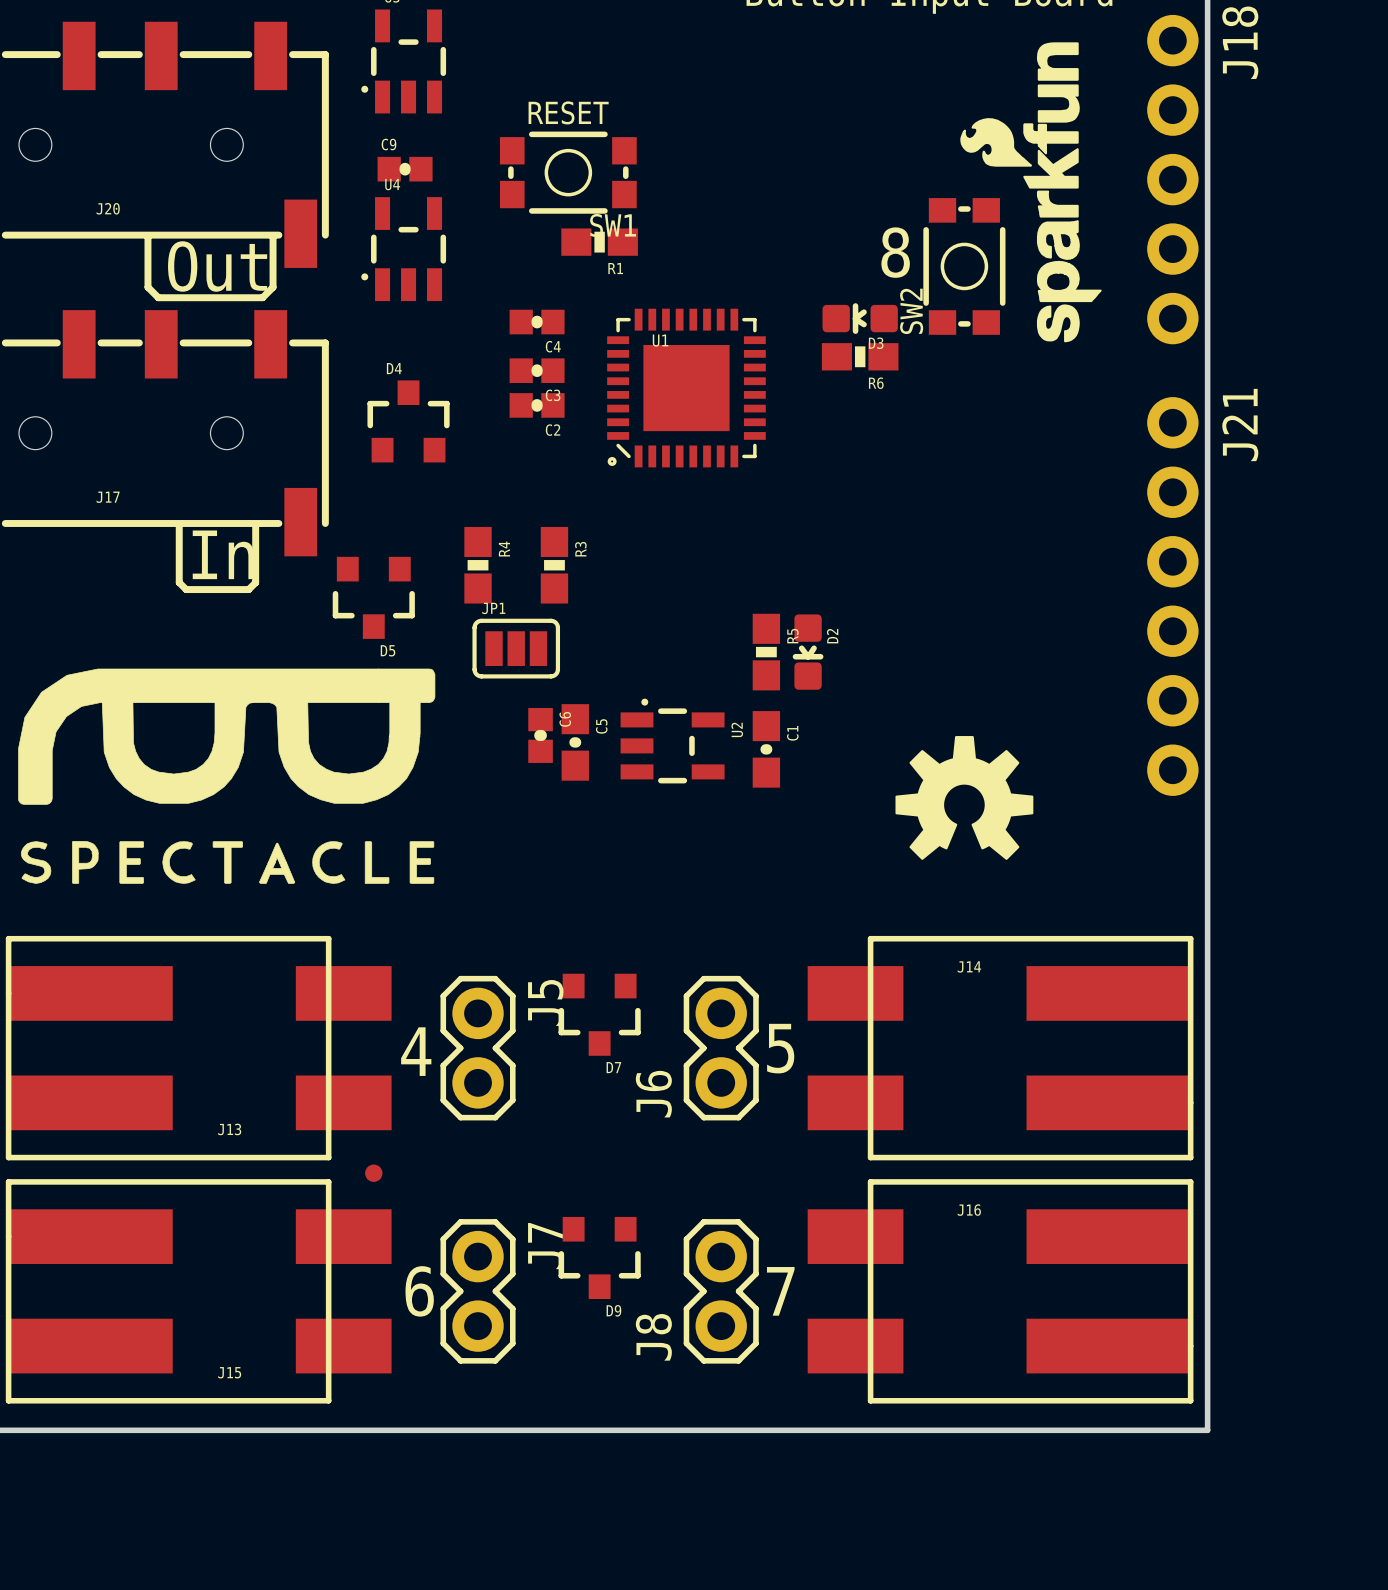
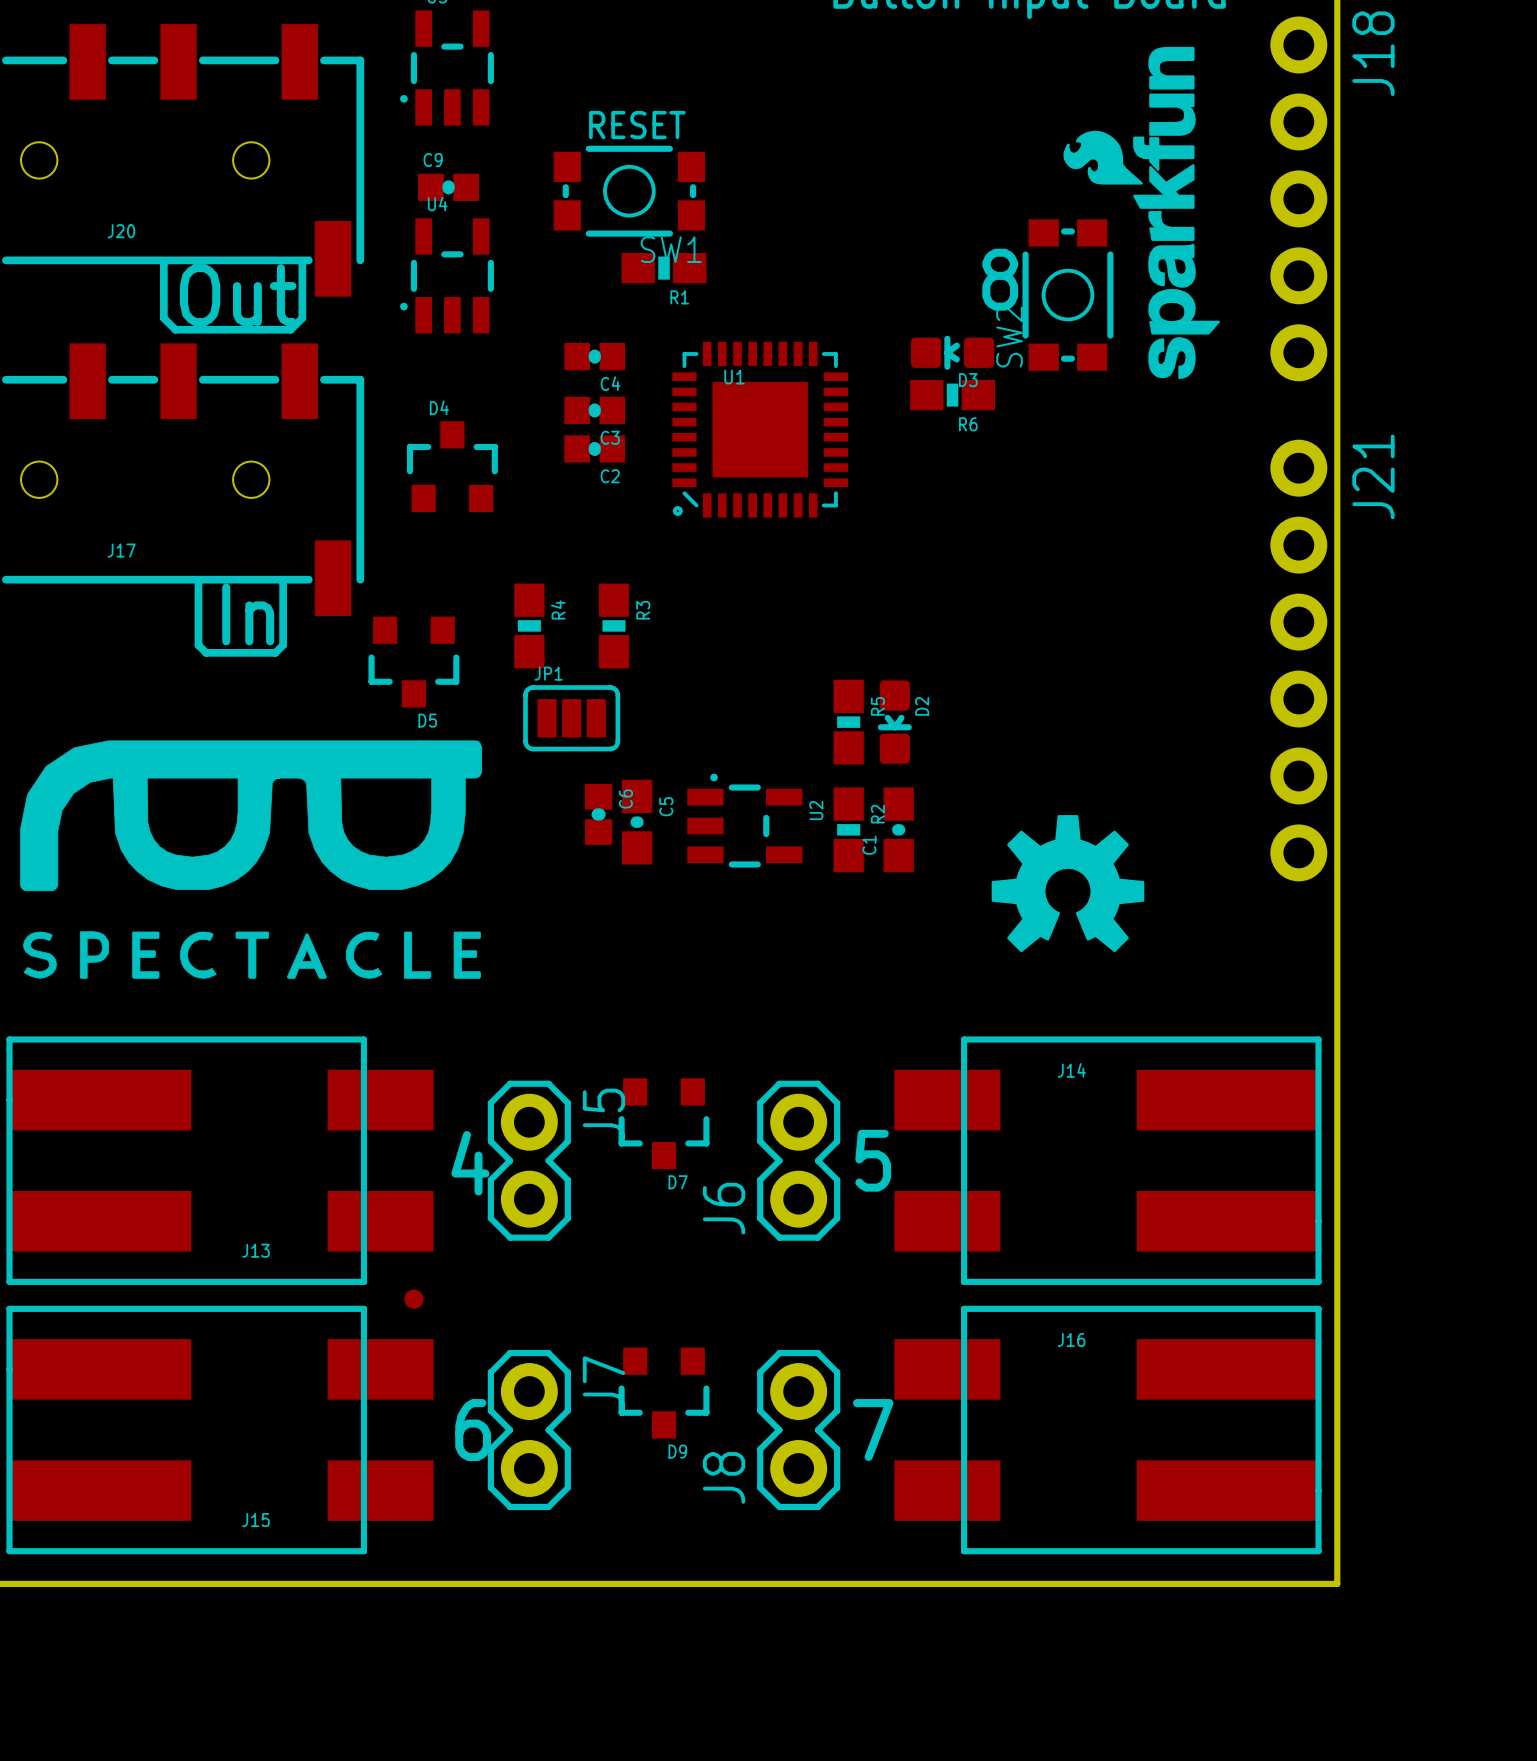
C1 name position: C1 (792, 733) -> C1 (869, 845)
C1 position: (766, 749) -> (898, 829)
R2: none -> (848, 829)

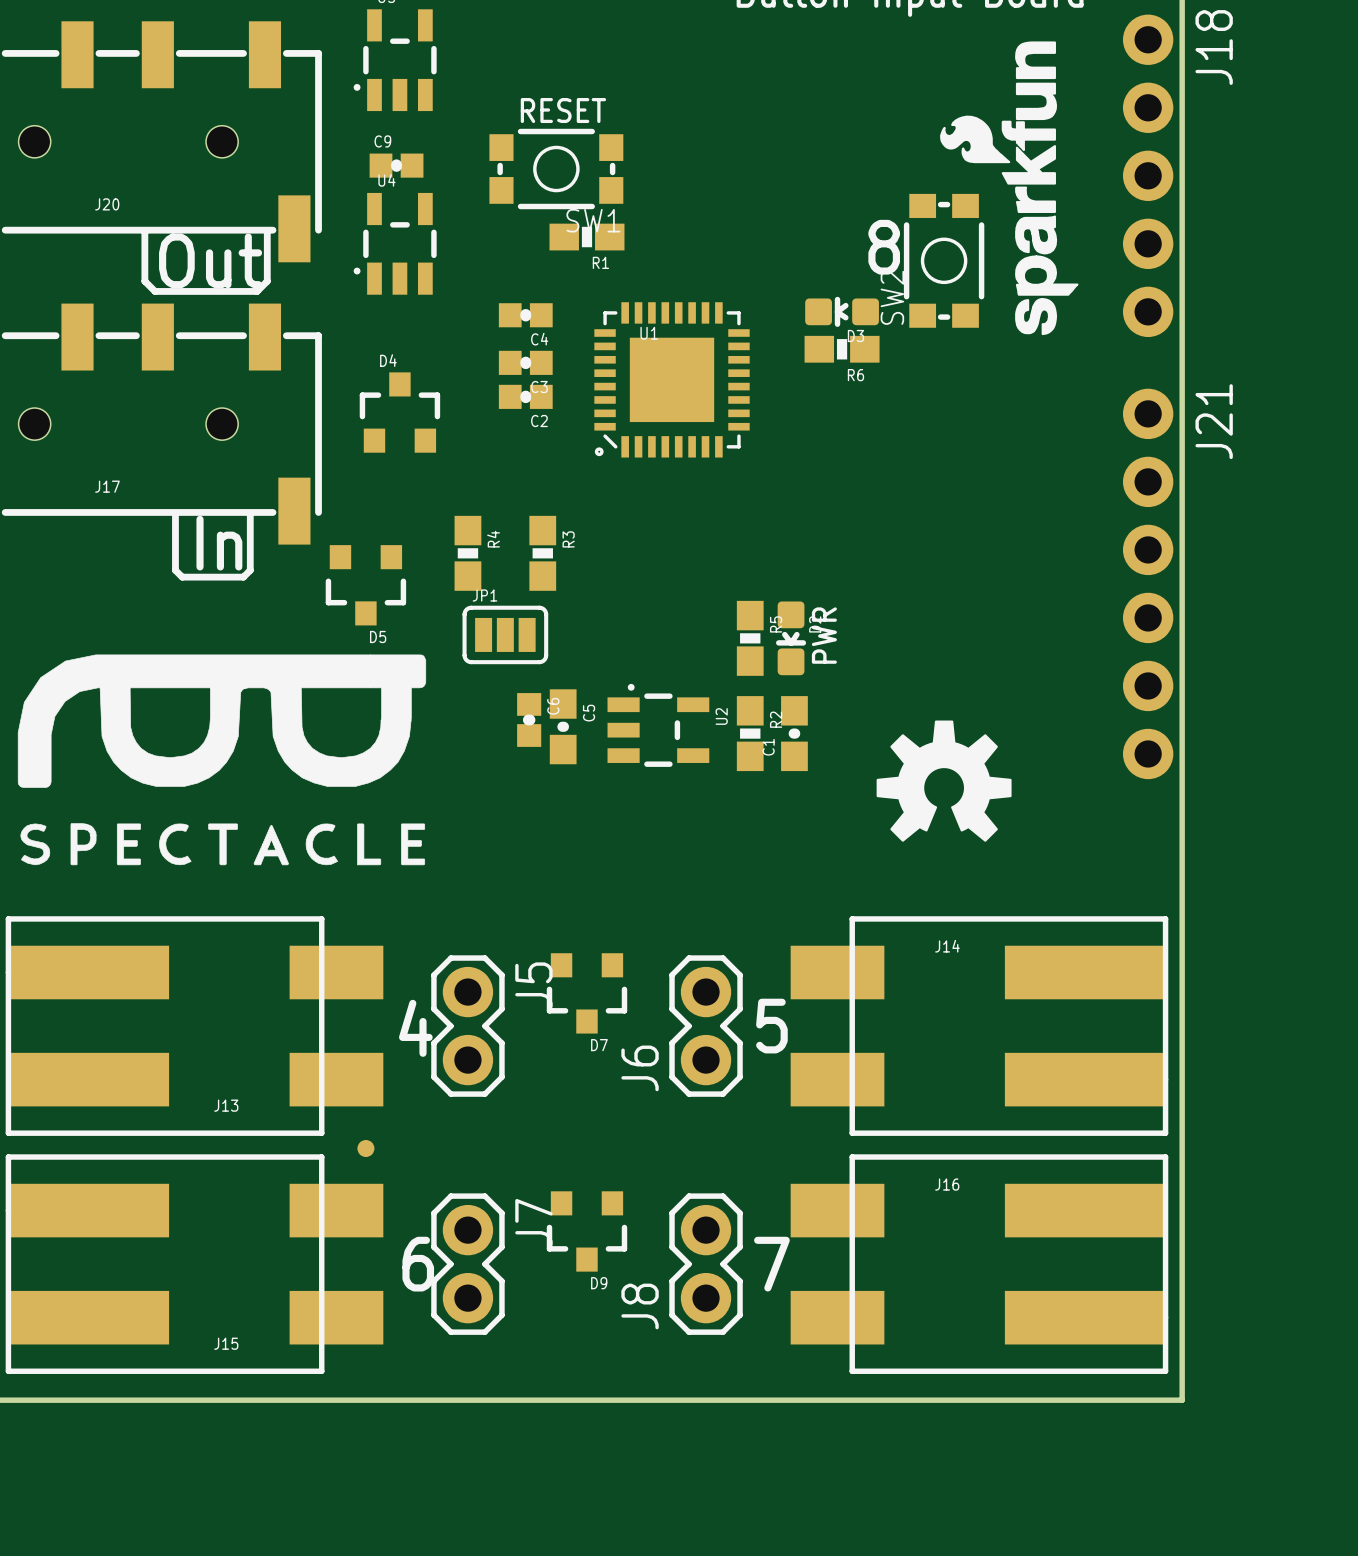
text: none -> PWR (824, 635)

